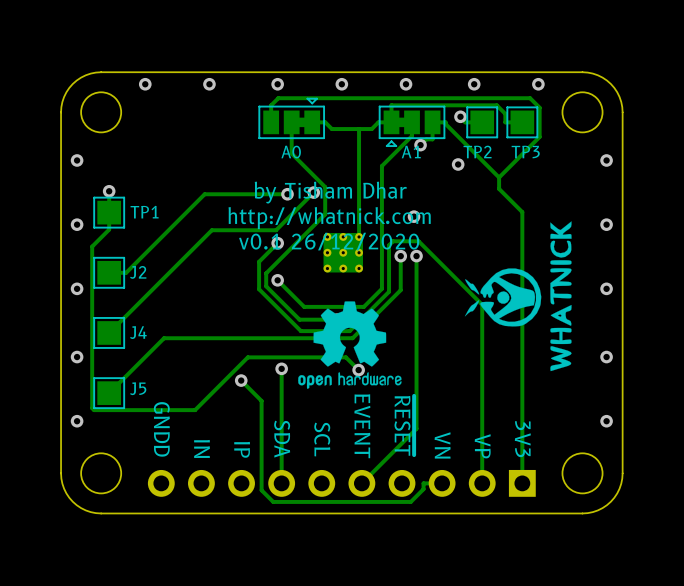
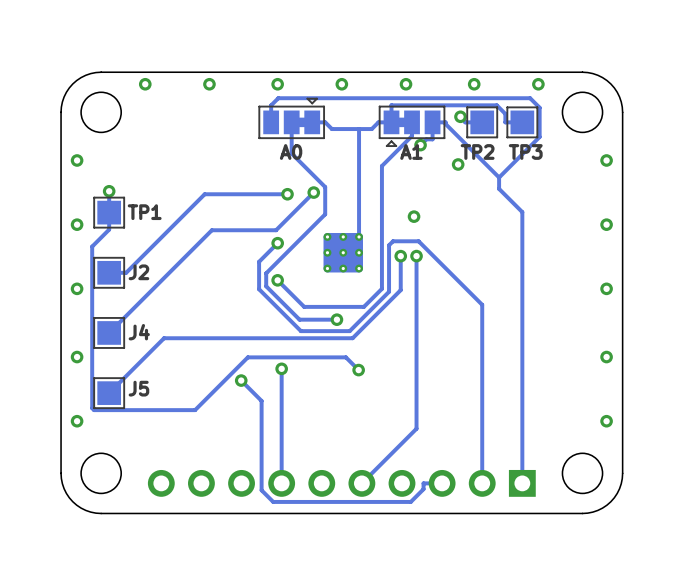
text: by Tisham Dhar (330, 192) -> none
text: http://whatnick.com (329, 218) -> none
drawing: [464, 221, 572, 372] -> none
text: v0.1 26/12/2020 (329, 241) -> none
drawing: [298, 301, 402, 389] -> none
text: ~{RESET} (404, 425) -> none
text: EVENT (362, 426) -> none
text: GNDD (161, 429) -> none
text: SDA (282, 439) -> none
text: SCL (322, 439) -> none
text: 3V3 (522, 439) -> none
text: VN (442, 445) -> none
text: VP (482, 446) -> none
text: IN (202, 448) -> none
text: IP (242, 449) -> none

